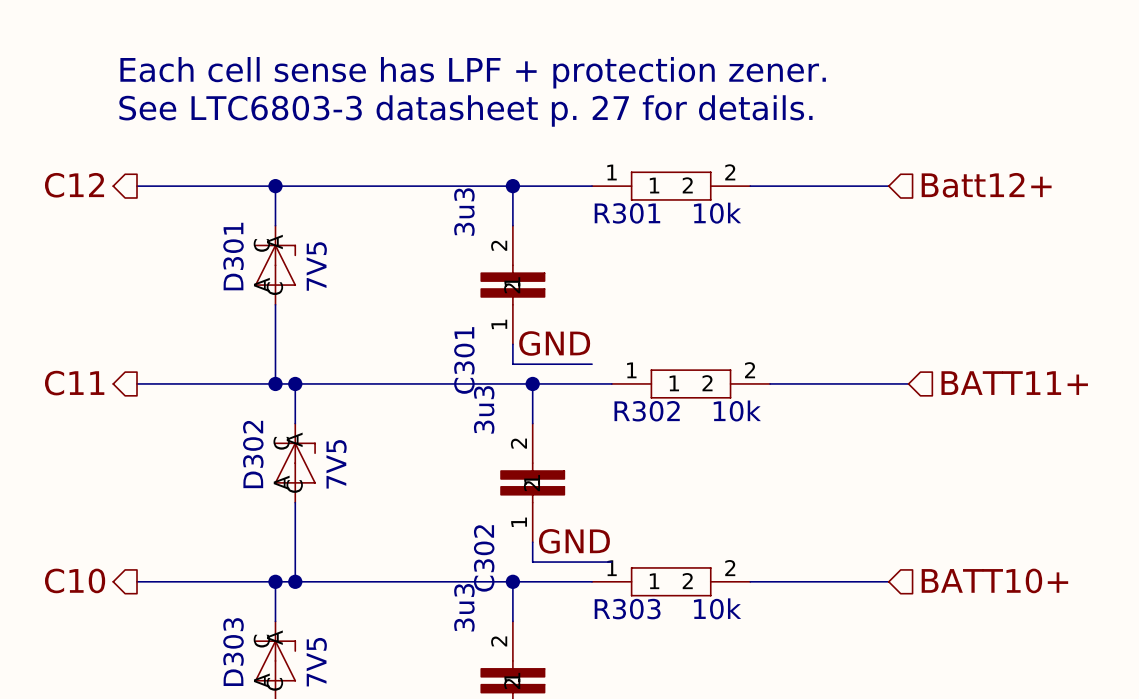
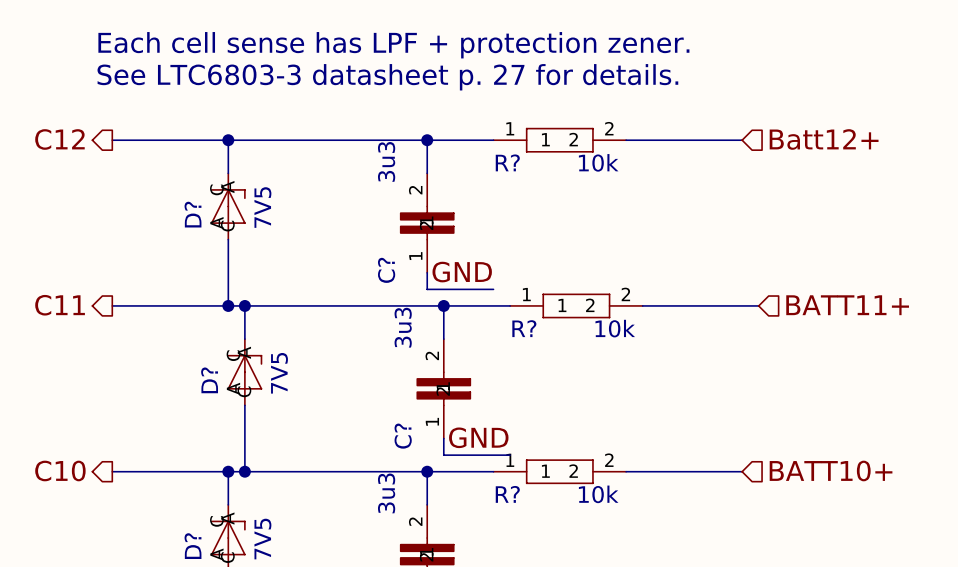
R301 name: R301 (627, 213) -> R? (507, 162)
D301 name: D301 (233, 256) -> D? (192, 214)
C301 name: C301 (464, 360) -> C? (386, 270)
R302 name: R302 (647, 411) -> R? (524, 328)
D302 name: D302 (253, 454) -> D? (209, 380)
C302 name: C302 (484, 558) -> C? (403, 436)
R303 name: R303 (627, 609) -> R? (507, 494)
D303 name: D303 (233, 652) -> D? (192, 546)

